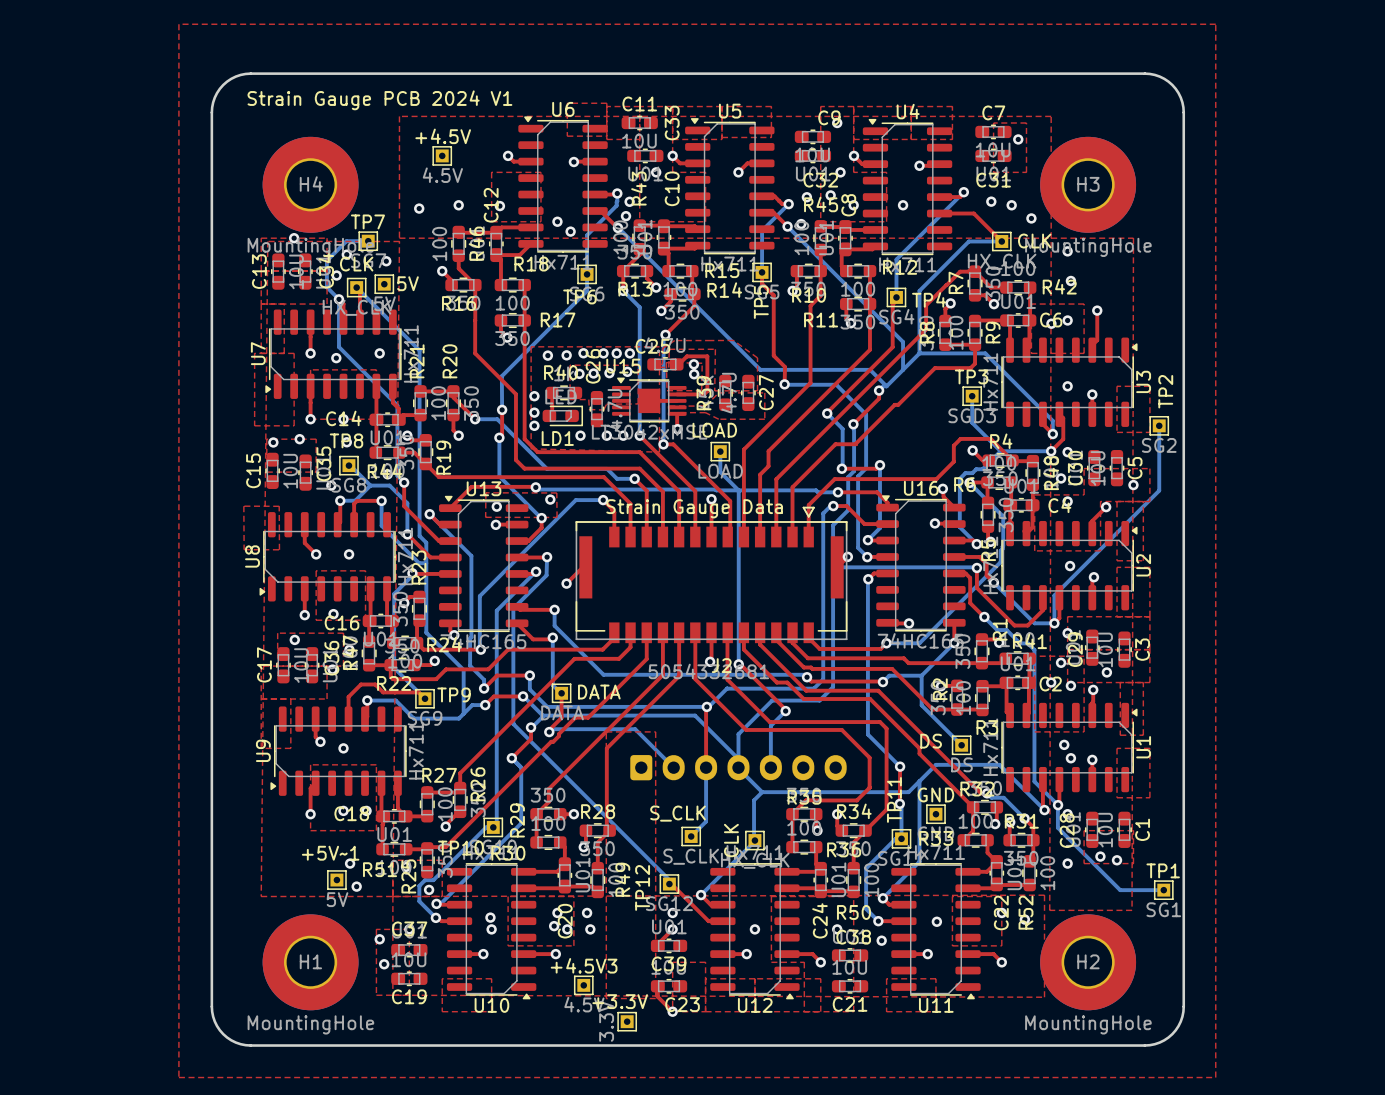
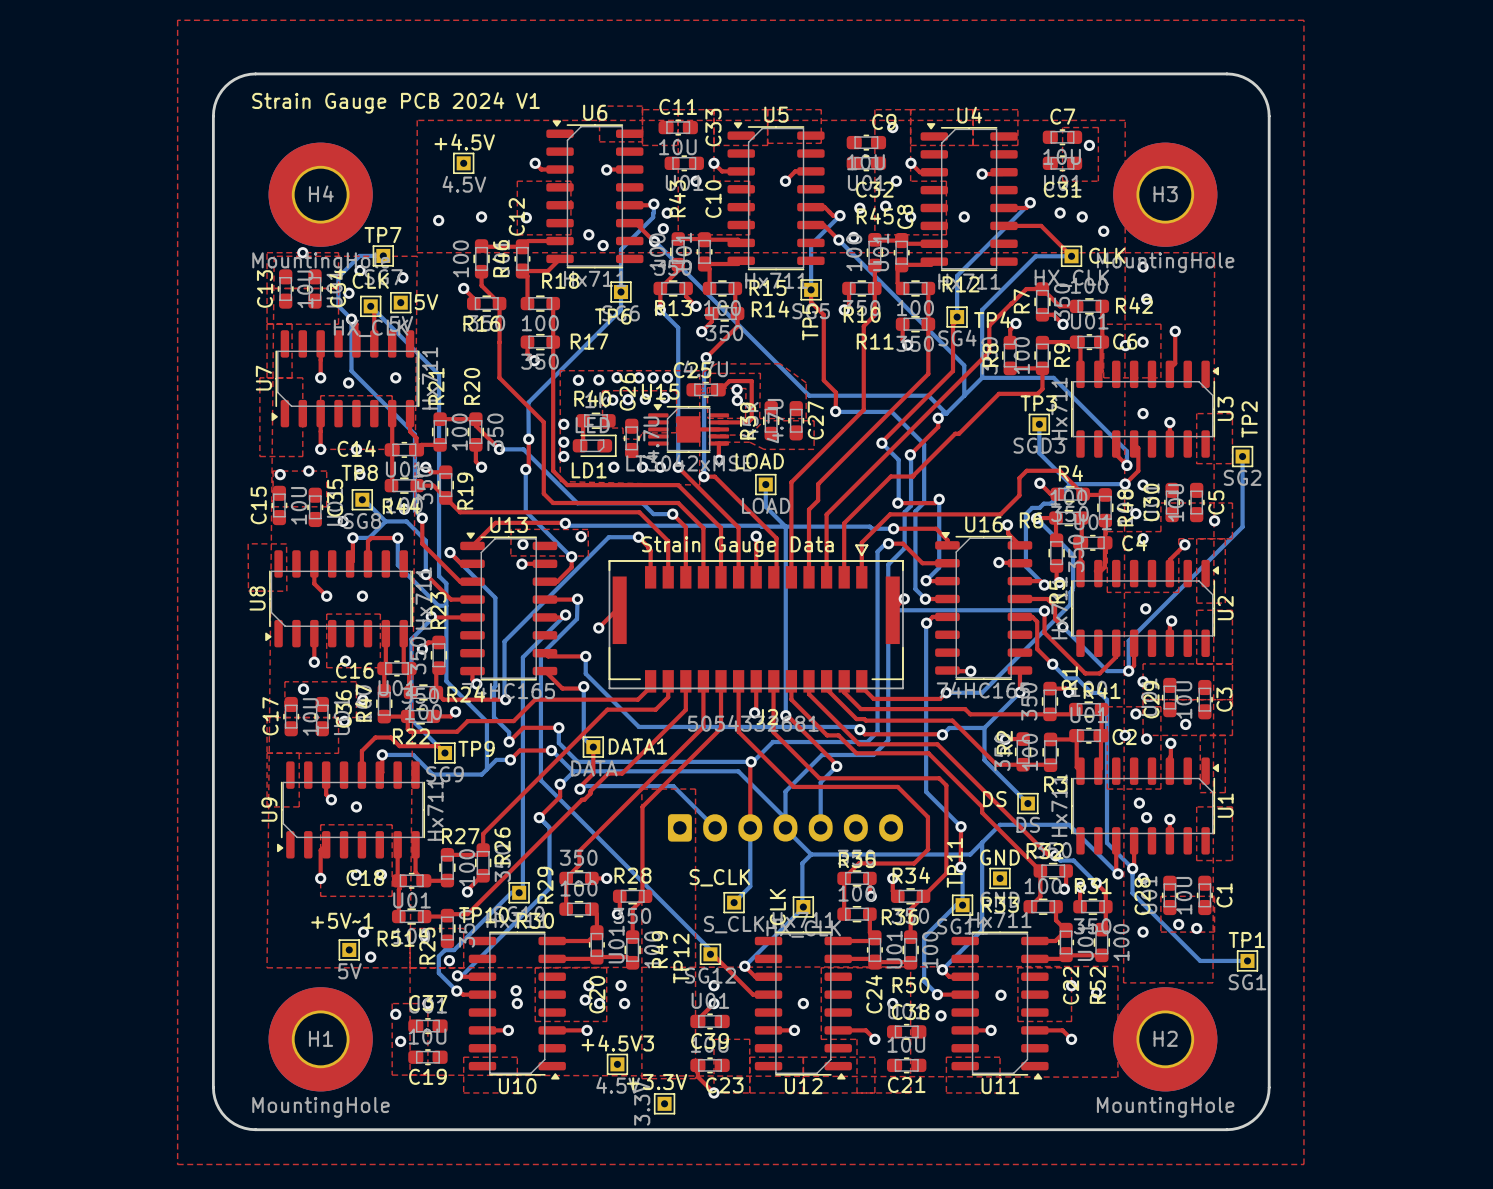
DATA name: DATA (599, 692) -> DATA1 (637, 746)

